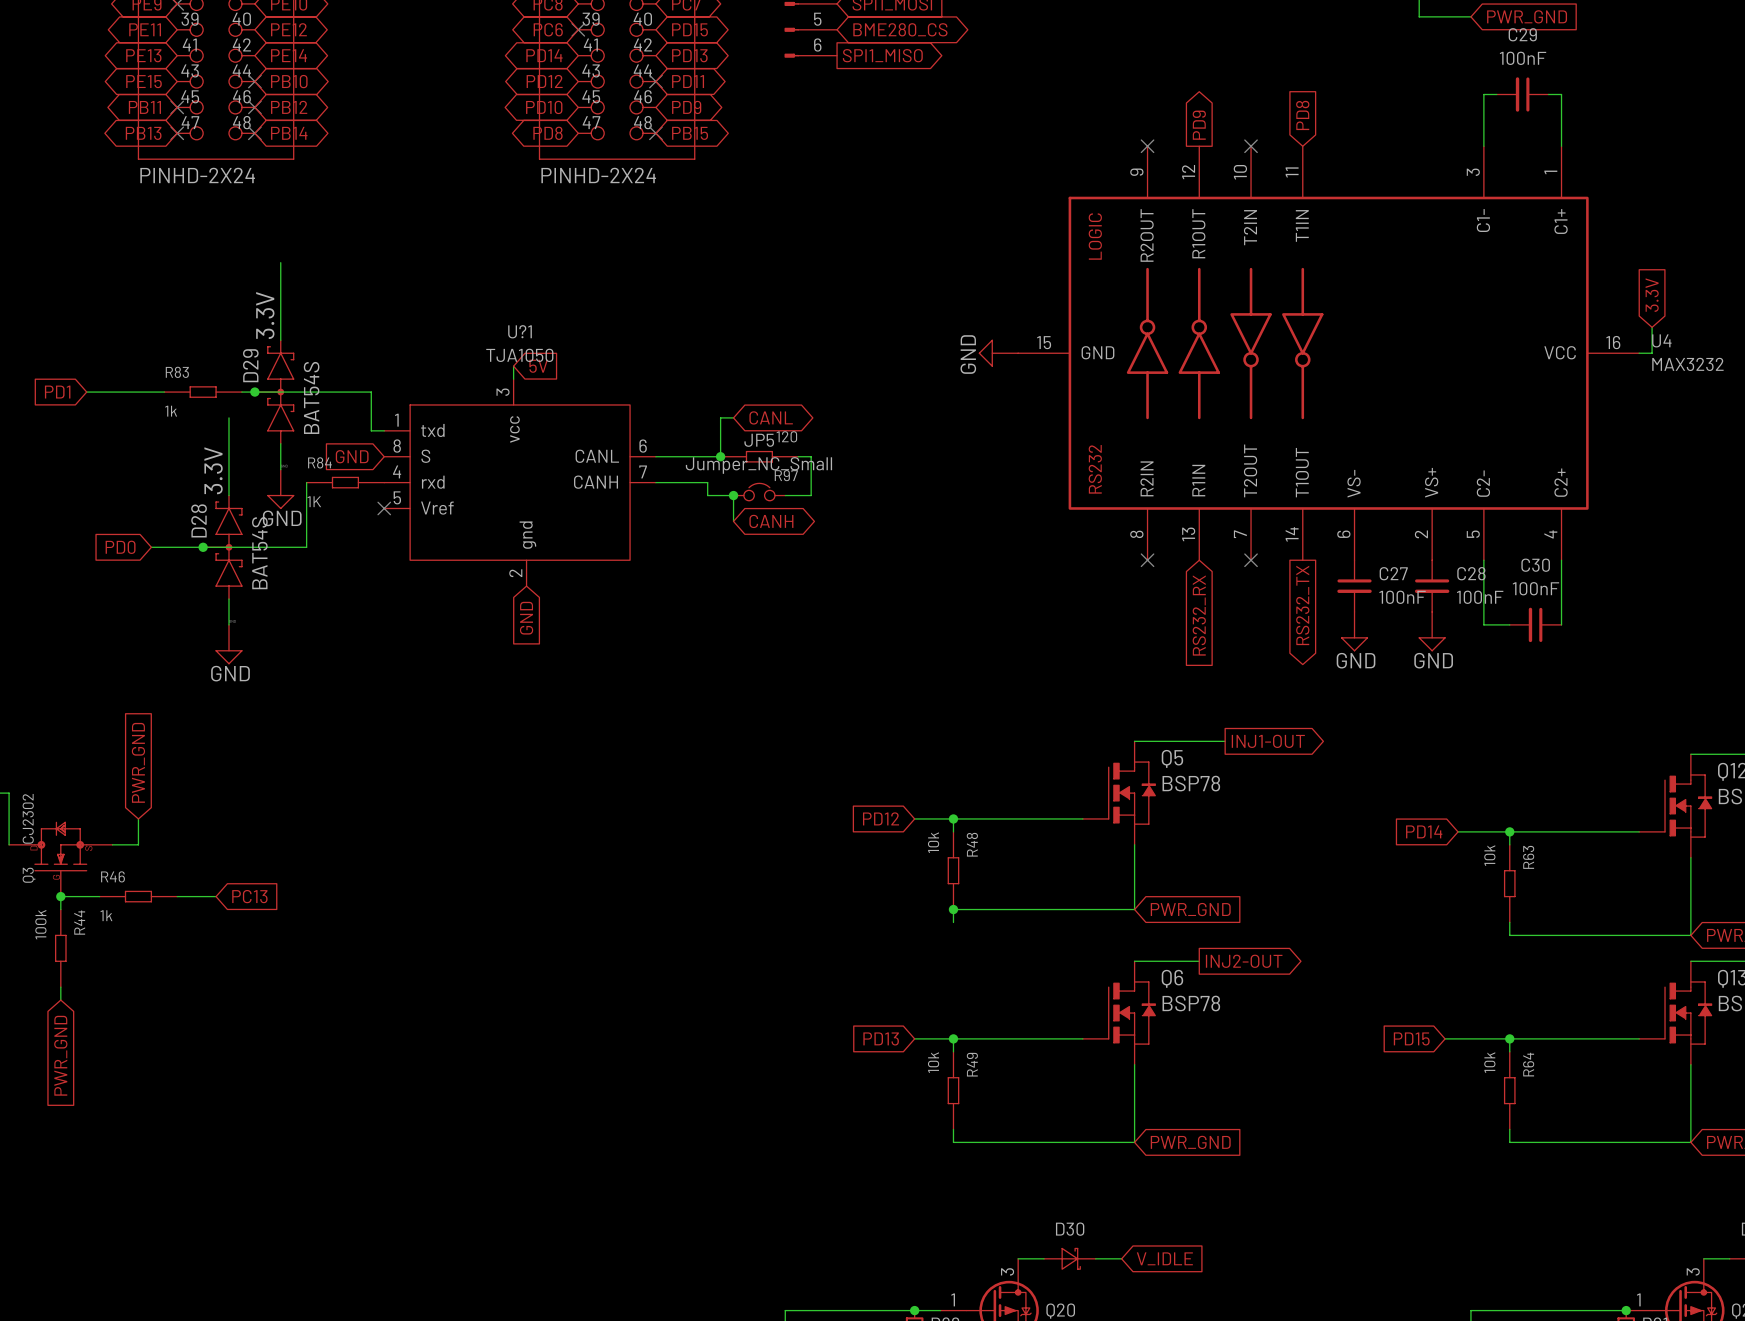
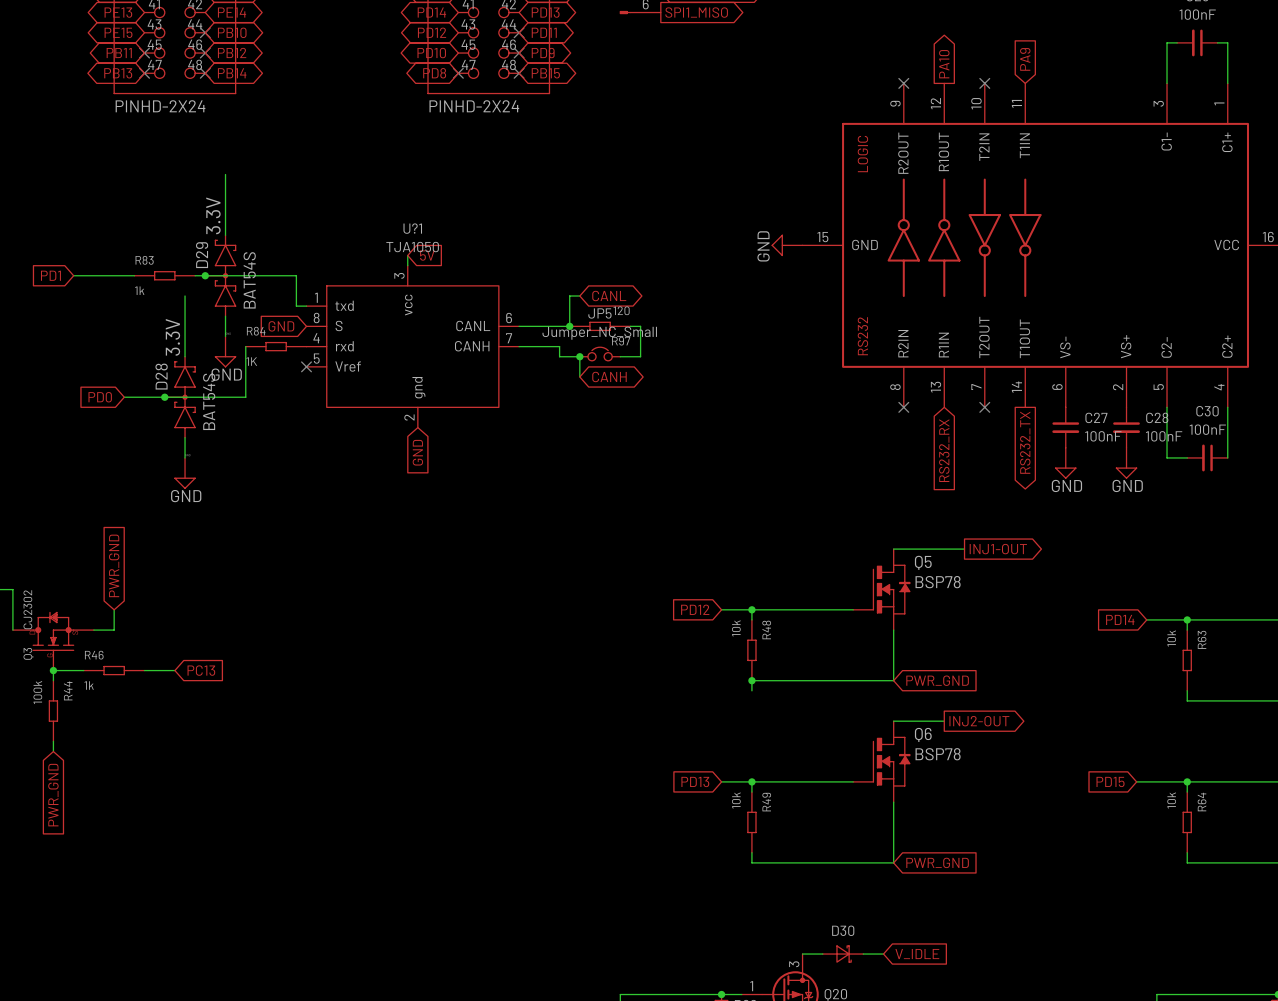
no-connect mark: none -> (519, 53)
global label: PD8 (1302, 115) -> PA9 (1025, 59)
global label: PD9 (1199, 125) -> PA10 (944, 64)
no-connect mark: none -> (458, 73)

